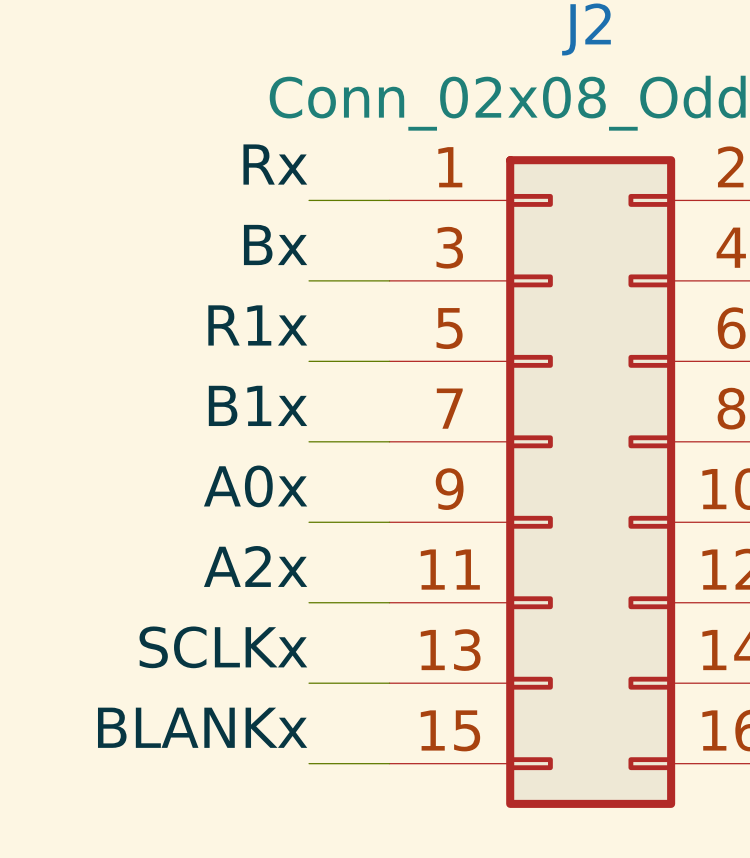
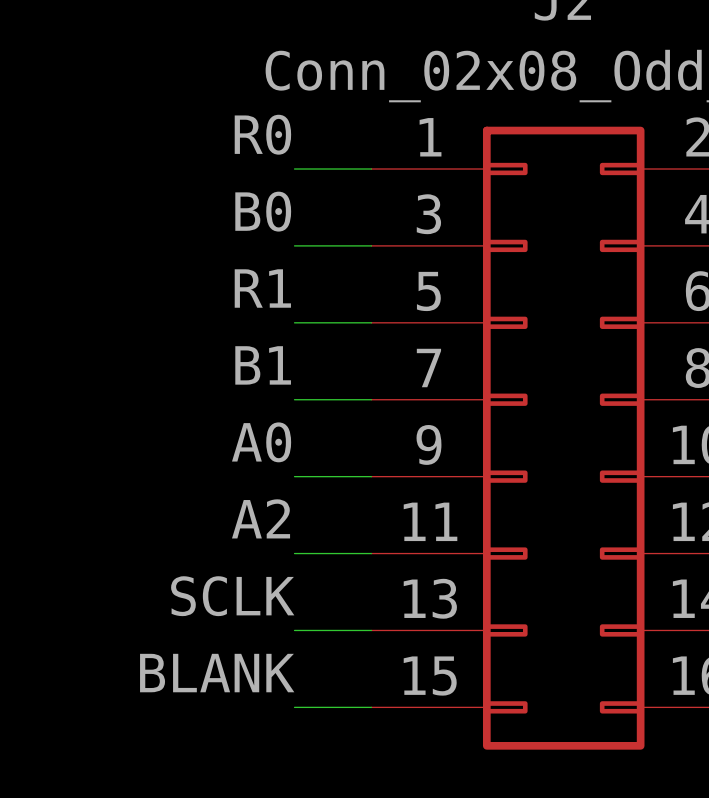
label: Rx (275, 164) -> R0 (262, 134)
label: Bx (275, 244) -> B0 (263, 211)
label: R1x (257, 325) -> R1 (262, 288)
label: B1x (258, 405) -> B1 (263, 365)
label: A0x (255, 486) -> A0 (261, 442)
label: A2x (255, 566) -> A2 (261, 518)
label: SCLKx (223, 647) -> SCLK (232, 596)
label: BLANKx (202, 727) -> BLANK (217, 673)

